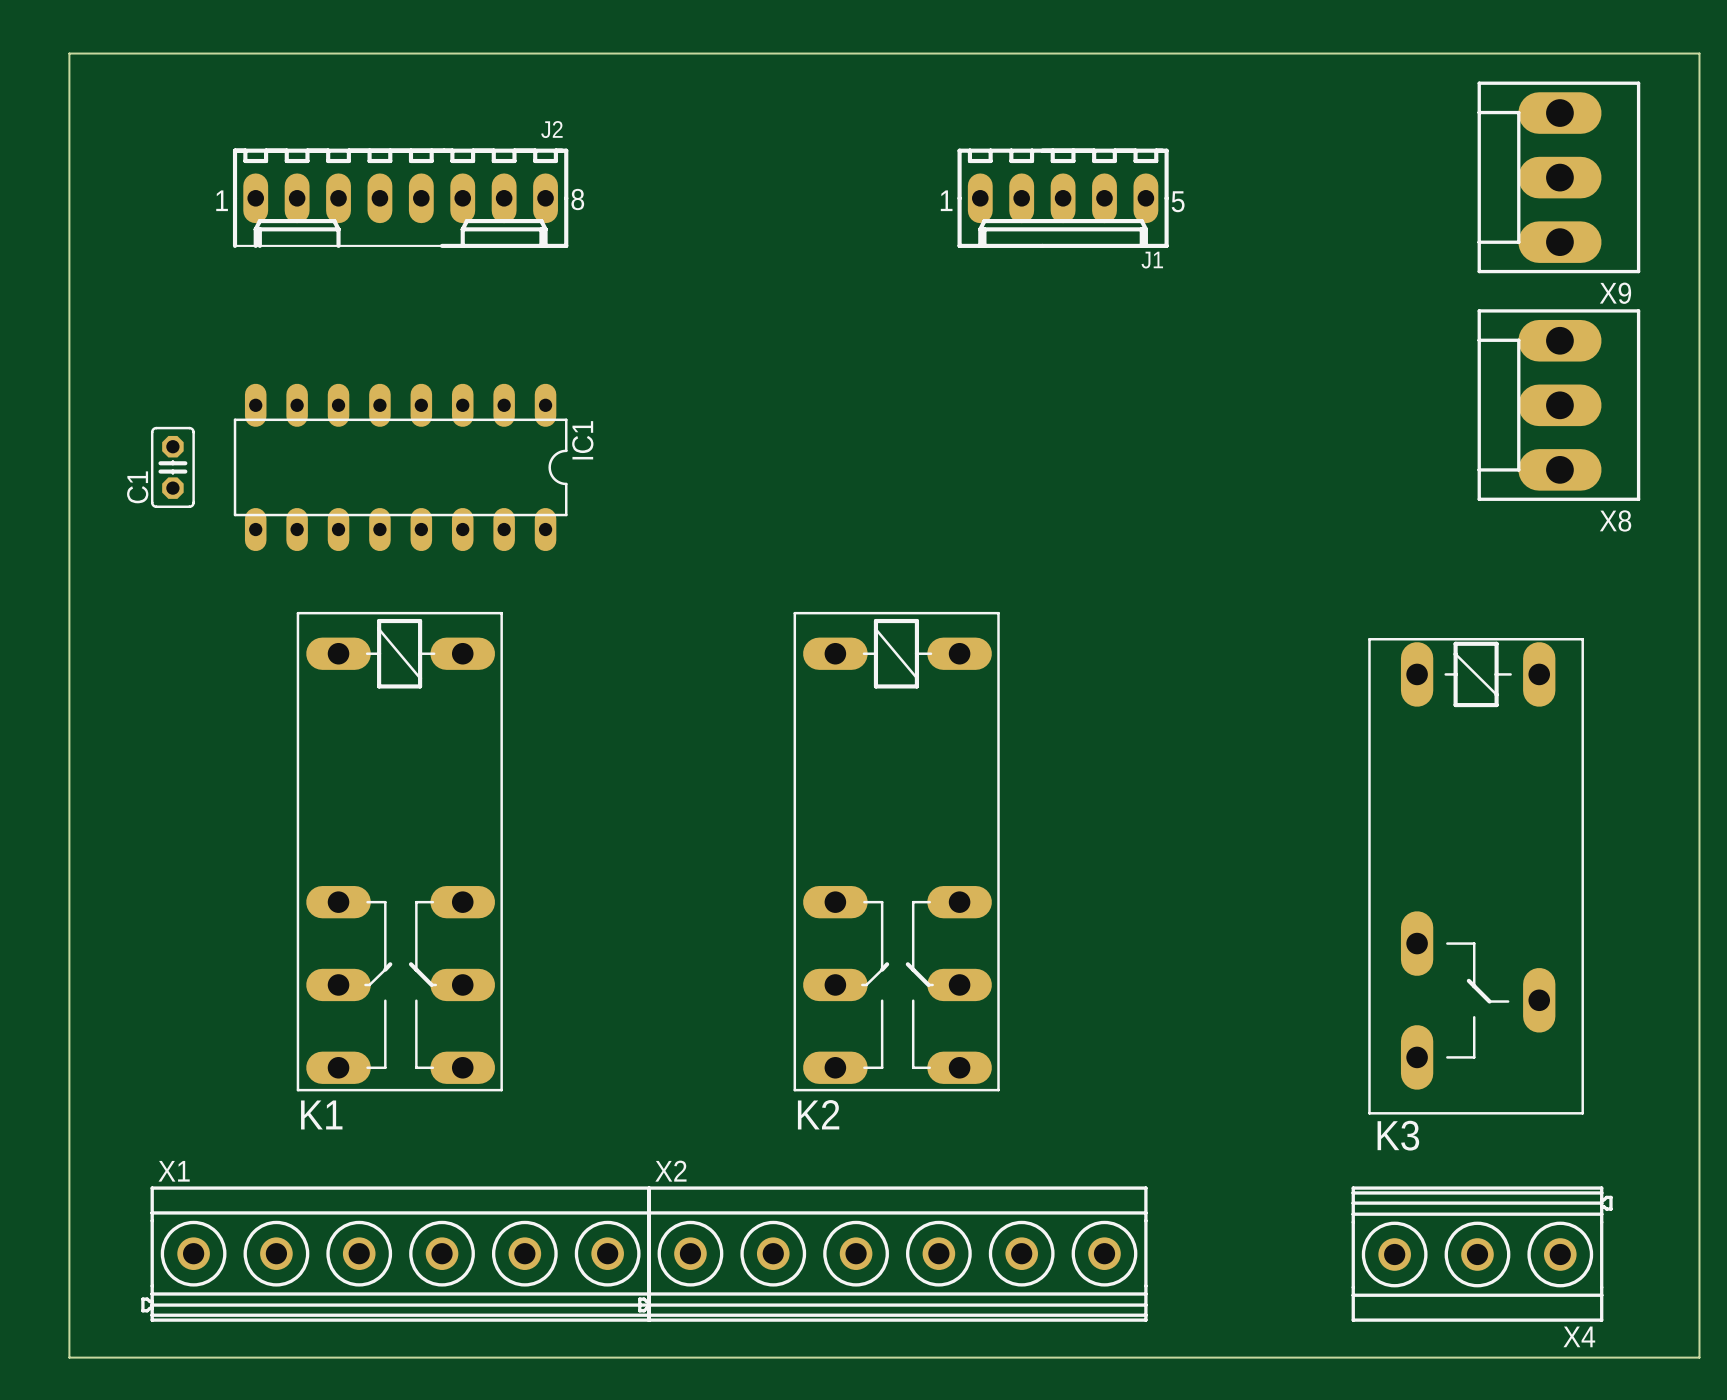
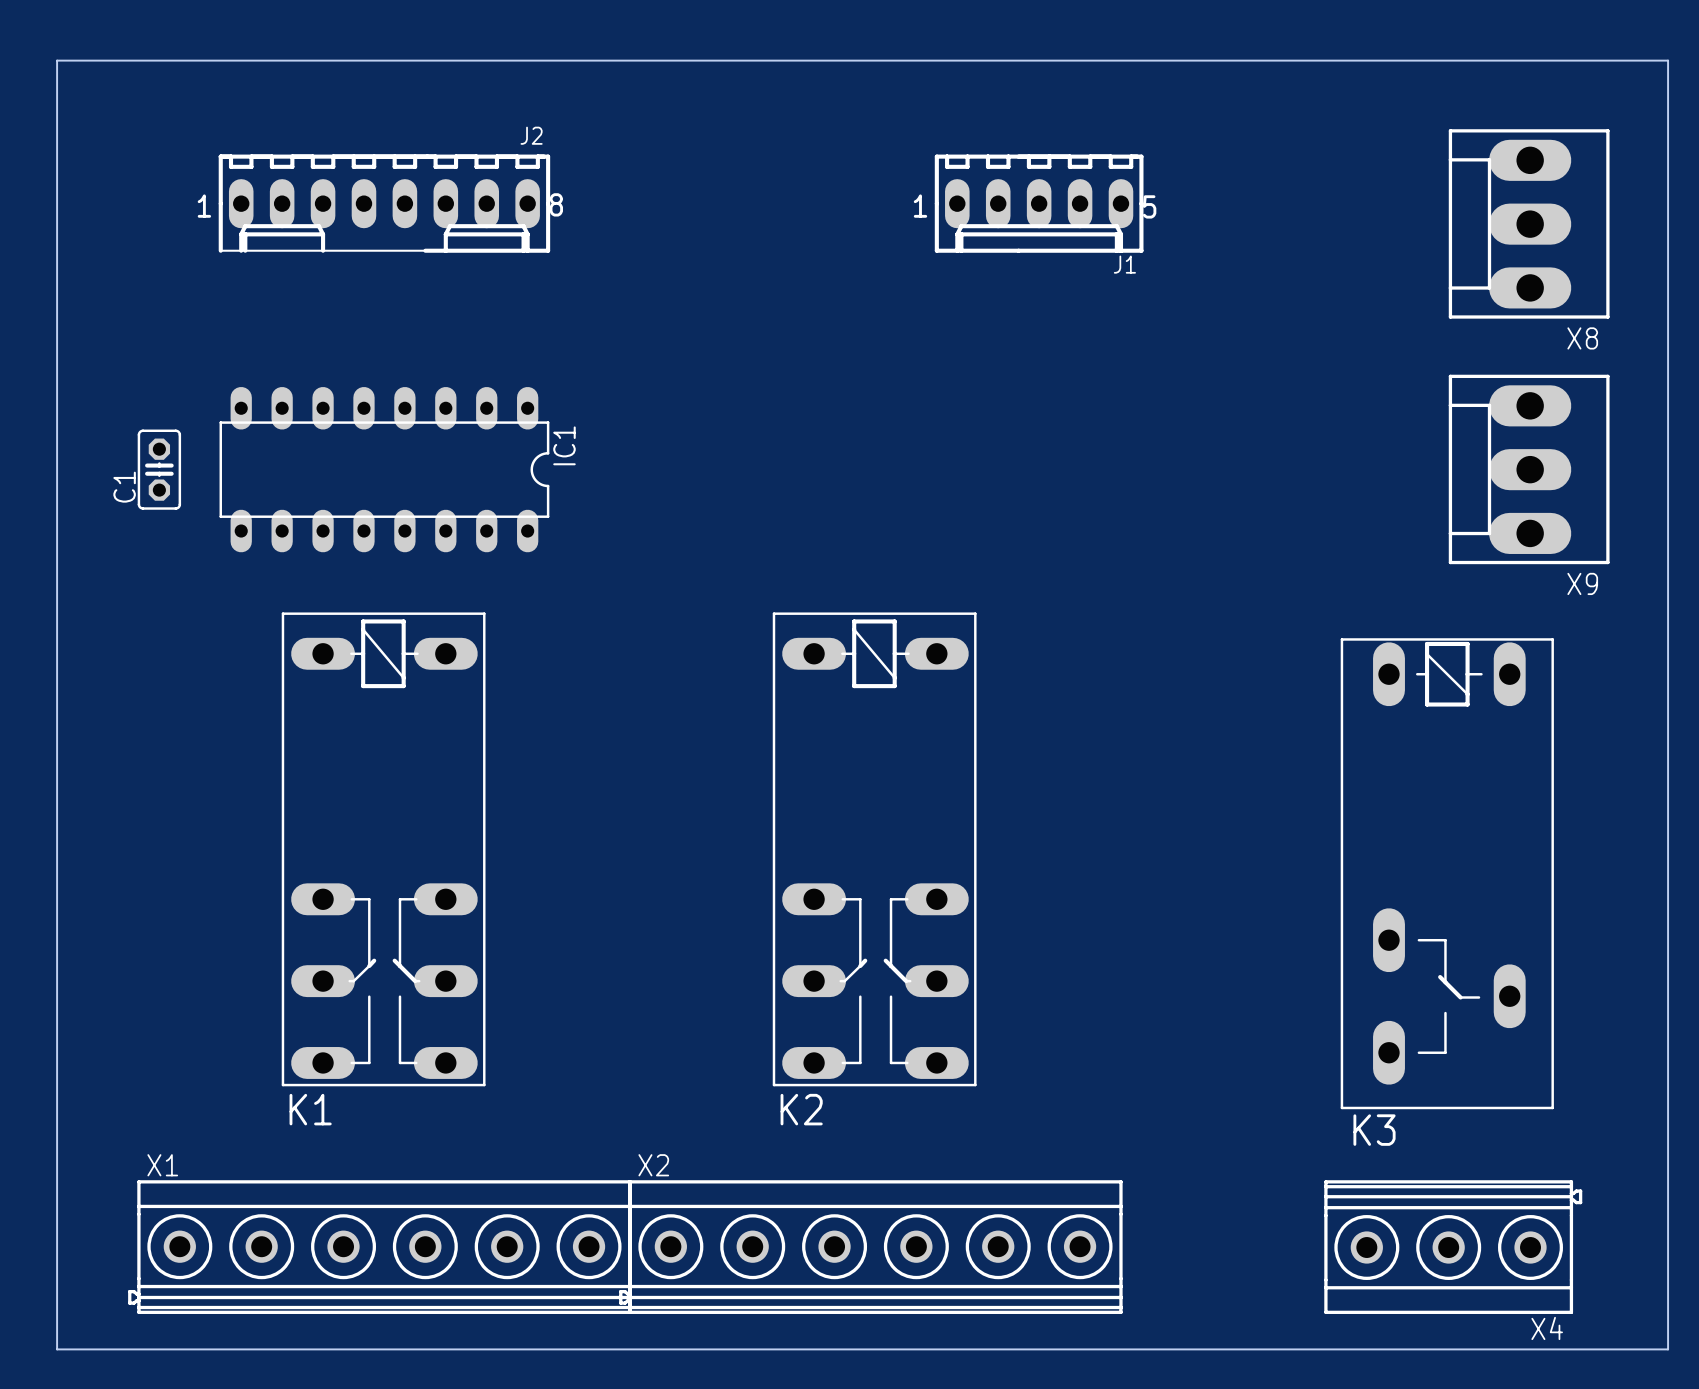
X9 position: (1558, 177) -> (1529, 469)
X8 position: (1558, 405) -> (1529, 223)

